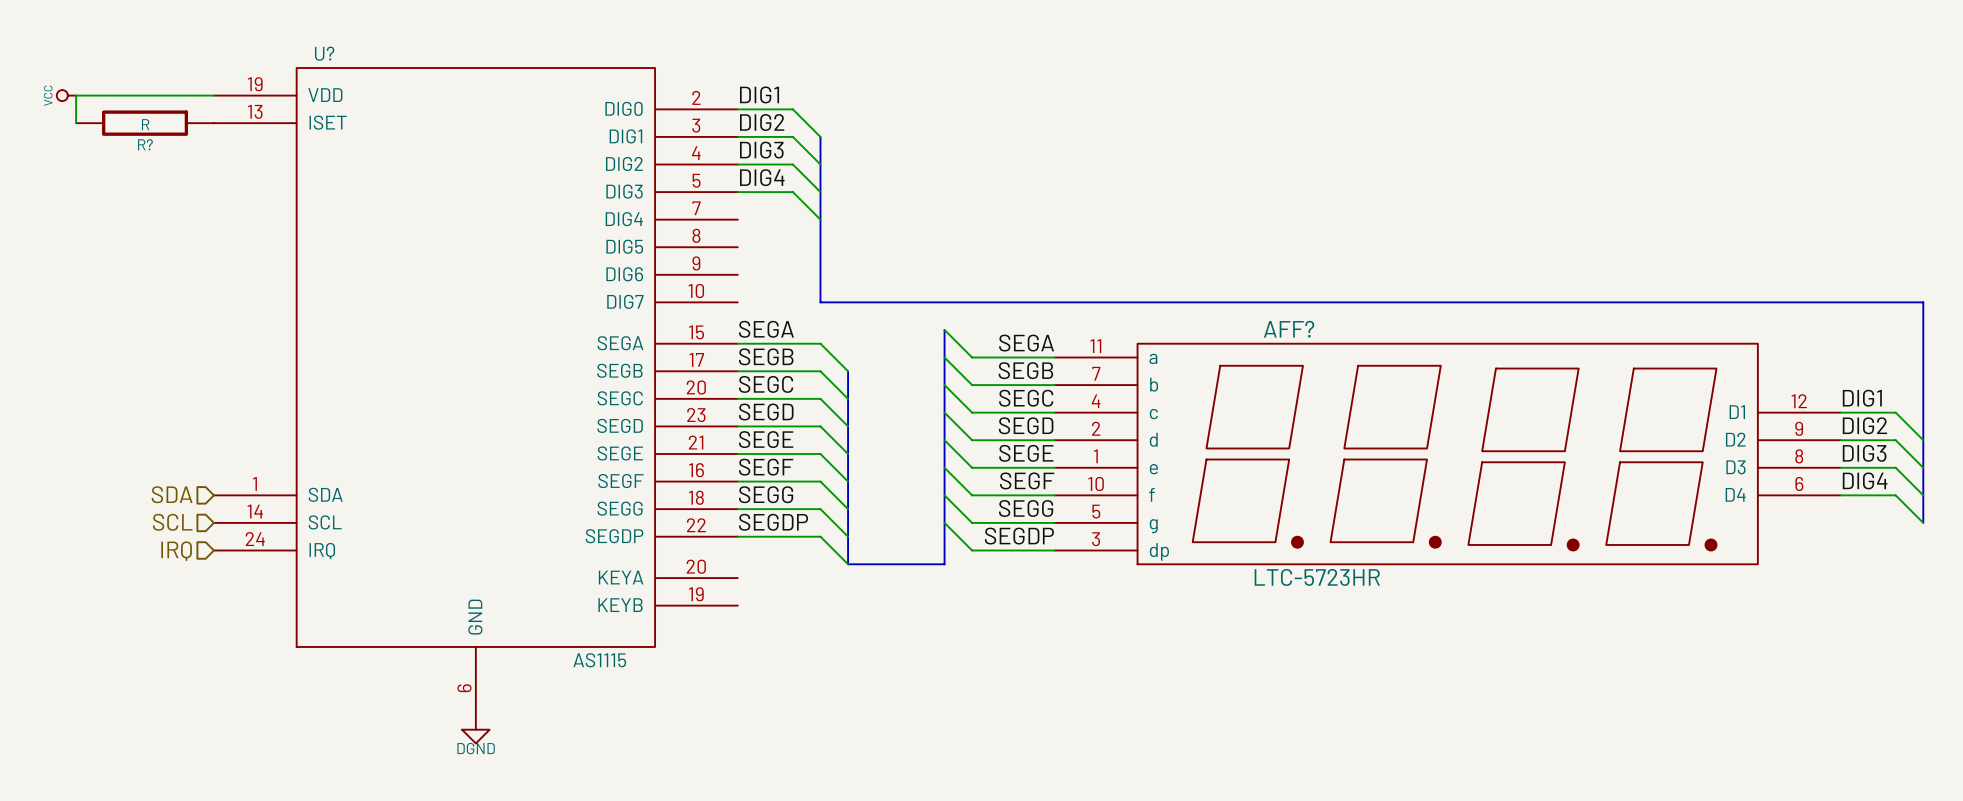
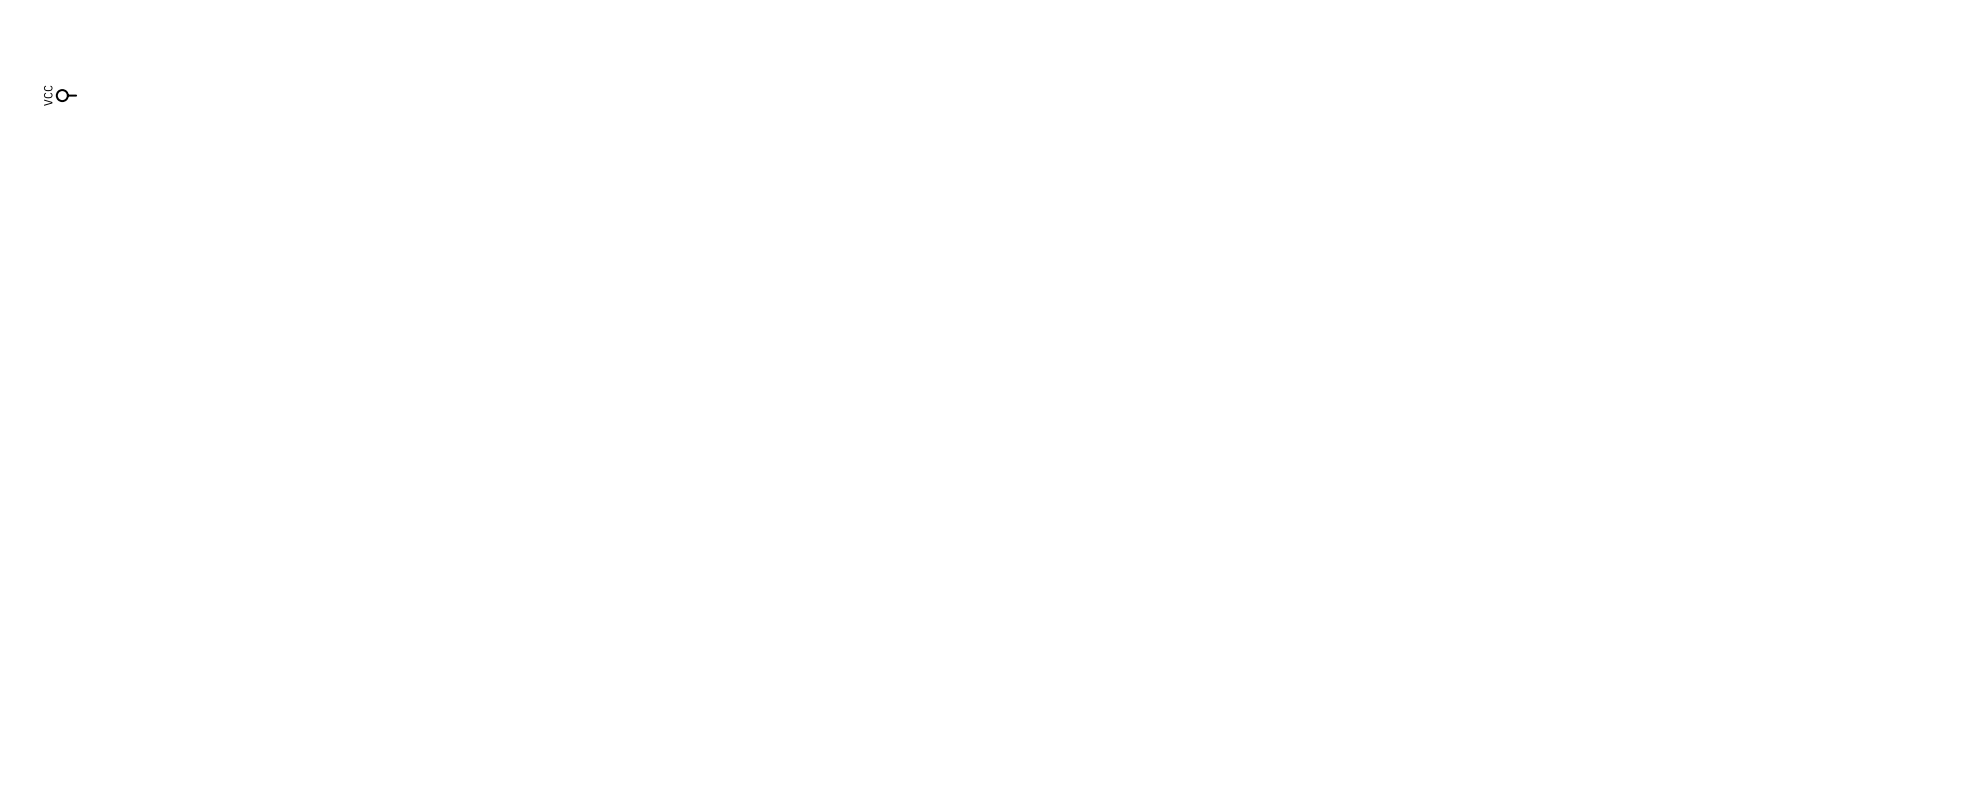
label: DIG1 (759, 94) -> none
wire: (213, 95) (76, 95) (76, 123) -> none
wire: (737, 109) (792, 109) (820, 136) -> none
label: DIG2 (762, 122) -> none
R?: R (145, 123) -> none
wire: (737, 136) (792, 136) (820, 164) -> none
bus: (820, 136) (820, 302) (1923, 302) (1923, 522) -> none
label: DIG3 (761, 150) -> none
wire: (737, 164) (792, 164) (820, 192) -> none
label: DIG4 (762, 177) -> none
wire: (737, 192) (792, 192) (820, 219) -> none
label: SEGA (766, 329) -> none
wire: (944, 329) (972, 357) (1054, 357) -> none
bus: (944, 329) (944, 564) (848, 564) (848, 371) -> none
wire: (737, 343) (820, 343) (848, 371) -> none
label: SEGA (1026, 343) -> none
label: SEGB (766, 356) -> none
wire: (944, 357) (972, 385) (1054, 385) -> none
label: SEGB (1025, 370) -> none
wire: (737, 371) (820, 371) (848, 398) -> none
label: SEGC (766, 384) -> none
wire: (944, 385) (972, 412) (1054, 412) -> none
U?: AS1115 (475, 398) -> none
wire: (737, 398) (820, 398) (848, 426) -> none
label: SEGC (1026, 398) -> none
label: DIG1 (1862, 398) -> none
label: SEGD (766, 412) -> none
wire: (944, 412) (972, 440) (1054, 440) -> none
wire: (1840, 412) (1895, 412) (1923, 440) -> none
label: SEGD (1026, 425) -> none
label: DIG2 (1864, 425) -> none
wire: (737, 426) (820, 426) (848, 454) -> none
label: SEGE (766, 439) -> none
wire: (944, 440) (972, 467) (1054, 467) -> none
wire: (1840, 440) (1895, 440) (1923, 467) -> none
label: SEGE (1026, 453) -> none
label: DIG3 (1864, 453) -> none
wire: (737, 454) (820, 454) (848, 481) -> none
AFF?: LTC-5723HR (1447, 454) -> none
label: SEGF (766, 467) -> none
wire: (944, 467) (972, 495) (1054, 495) -> none
wire: (1840, 467) (1895, 467) (1923, 495) -> none
label: SEGF (1027, 480) -> none
label: DIG4 (1865, 480) -> none
wire: (737, 481) (820, 481) (848, 509) -> none
hierarchical label: SDA (172, 494) -> none
label: SEGG (766, 494) -> none
wire: (944, 495) (972, 522) (1054, 522) -> none
wire: (1840, 495) (1895, 495) (1923, 522) -> none
label: SEGG (1026, 508) -> none
wire: (737, 509) (820, 509) (848, 536) -> none
hierarchical label: SCL (172, 522) -> none
label: SEGDP (773, 522) -> none
wire: (944, 522) (972, 550) (1054, 550) -> none
wire: (737, 536) (820, 536) (848, 564) -> none
label: SEGDP (1019, 536) -> none
hierarchical label: IRQ (176, 551) -> none
power symbol: DGND (475, 736) -> none

